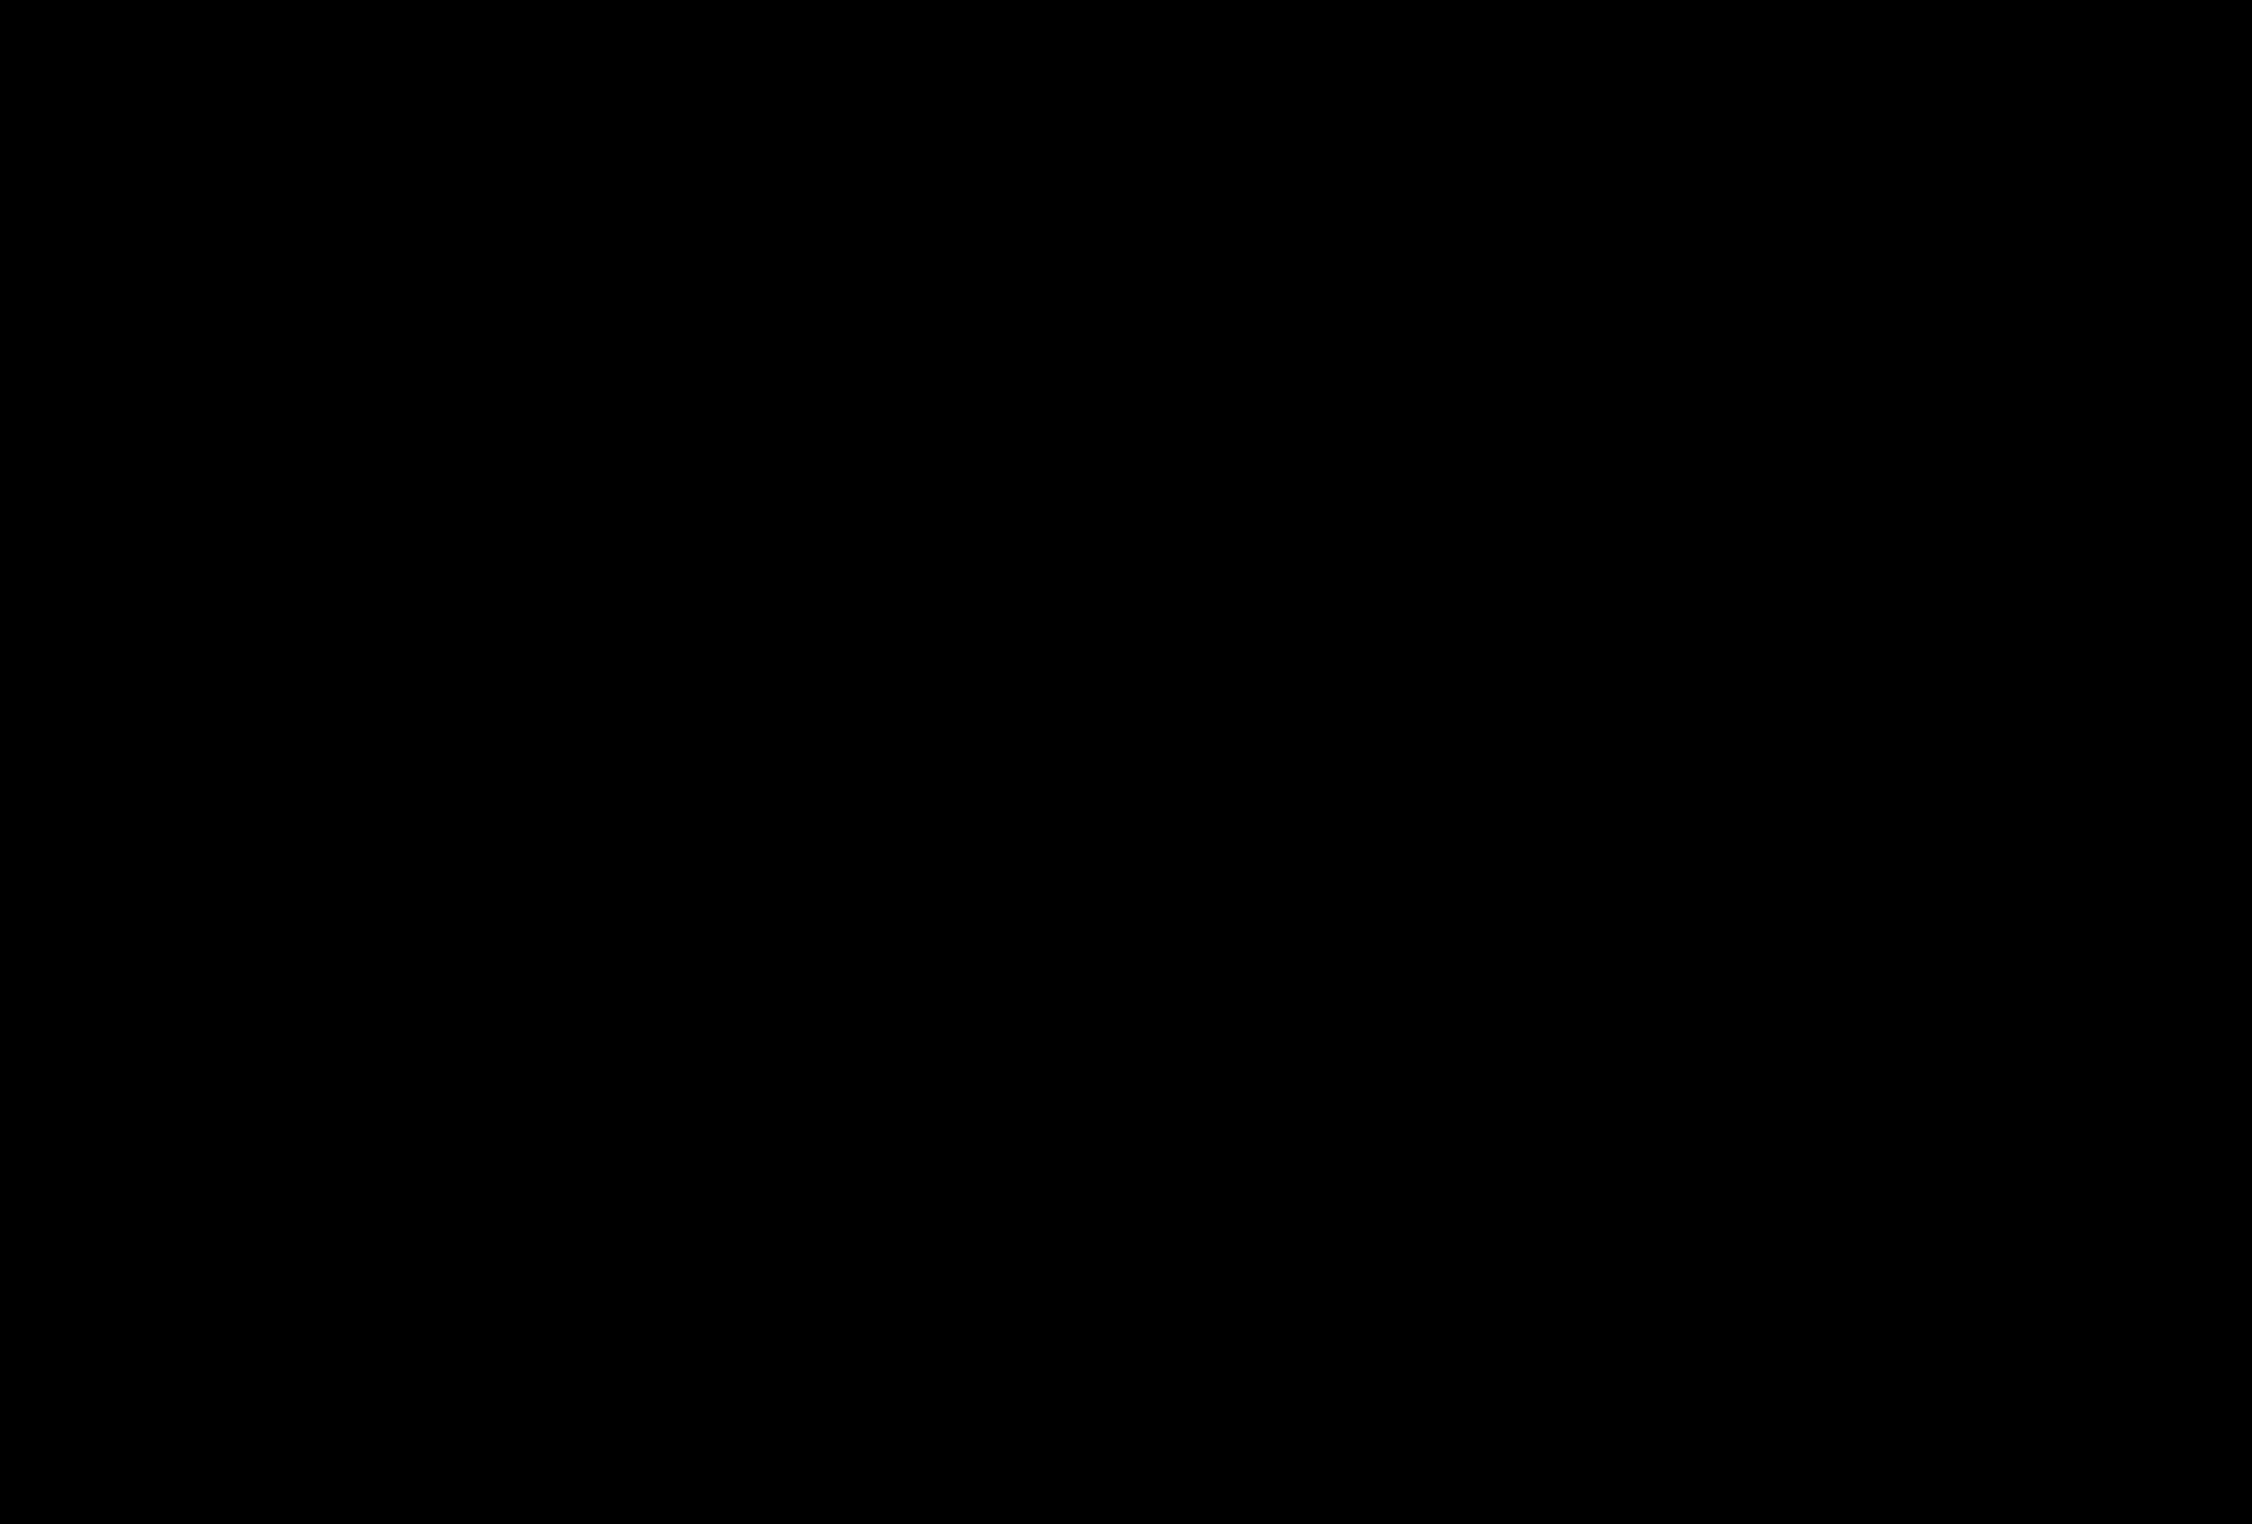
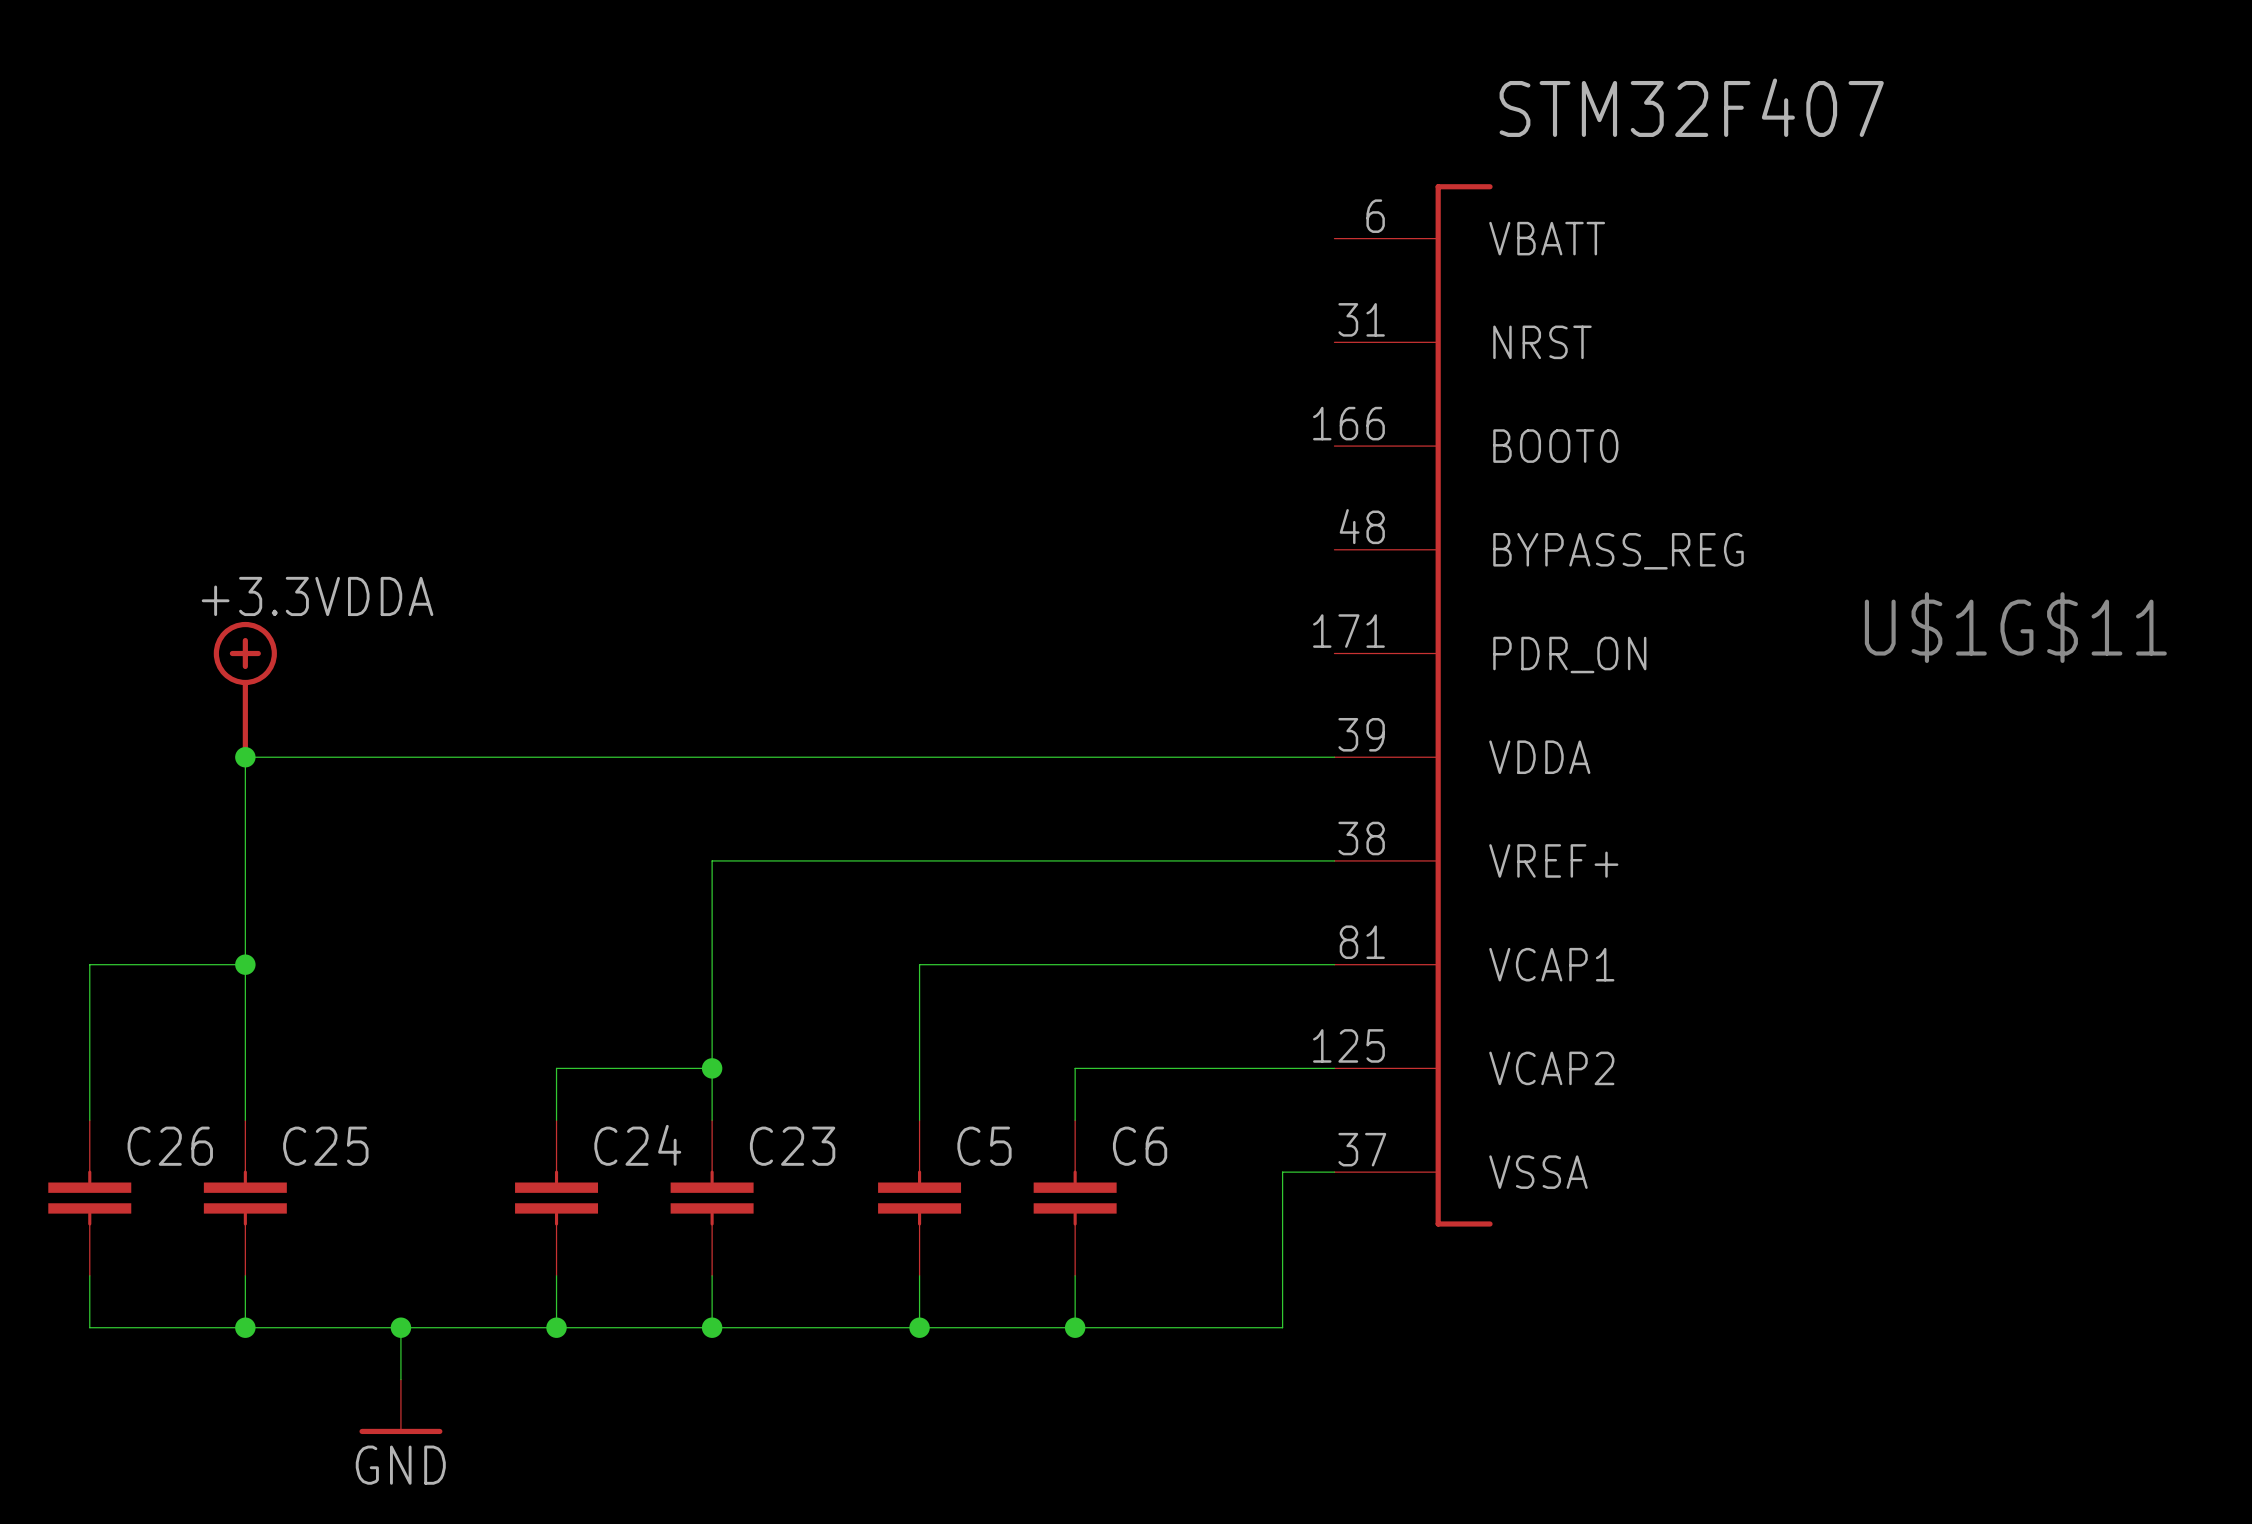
power symbol: none -> +3.3VDDA (245, 690)
U$1G$11: none -> STM32F407 (1413, 705)
junction: none -> (245, 757)
wire: none -> (1334, 757) (245, 757) (245, 1120)
wire: none -> (1334, 860) (712, 860) (712, 1120)
wire: none -> (245, 964) (89, 964) (89, 1120)
junction: none -> (245, 964)
wire: none -> (1334, 964) (919, 964) (919, 1120)
wire: none -> (712, 1068) (556, 1068) (556, 1120)
junction: none -> (712, 1068)
wire: none -> (1334, 1068) (1075, 1068) (1075, 1120)
wire: none -> (1334, 1172) (1282, 1172) (1282, 1327) (89, 1327) (89, 1275)
C26: none -> (89, 1198)
C25: none -> (245, 1198)
C24: none -> (556, 1198)
C23: none -> (712, 1198)
C5: none -> (919, 1198)
C6: none -> (1075, 1198)
wire: none -> (245, 1275) (245, 1327)
wire: none -> (556, 1275) (556, 1327)
wire: none -> (712, 1275) (712, 1327)
wire: none -> (919, 1275) (919, 1327)
wire: none -> (1075, 1275) (1075, 1327)
junction: none -> (245, 1327)
wire: none -> (400, 1327) (400, 1379)
junction: none -> (400, 1327)
junction: none -> (556, 1327)
junction: none -> (712, 1327)
junction: none -> (919, 1327)
junction: none -> (1075, 1327)
power symbol: none -> GND (400, 1406)

